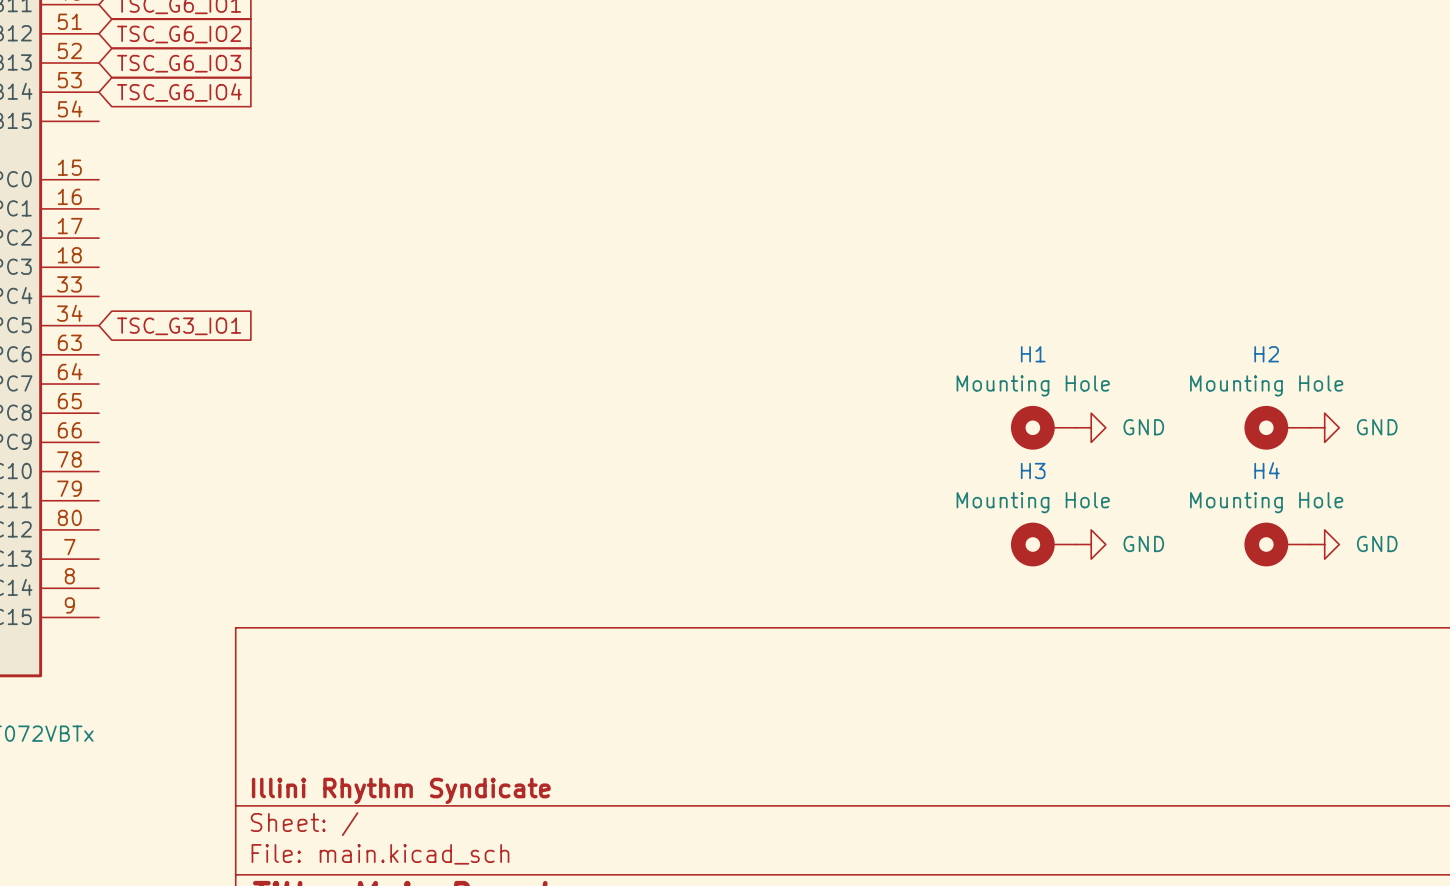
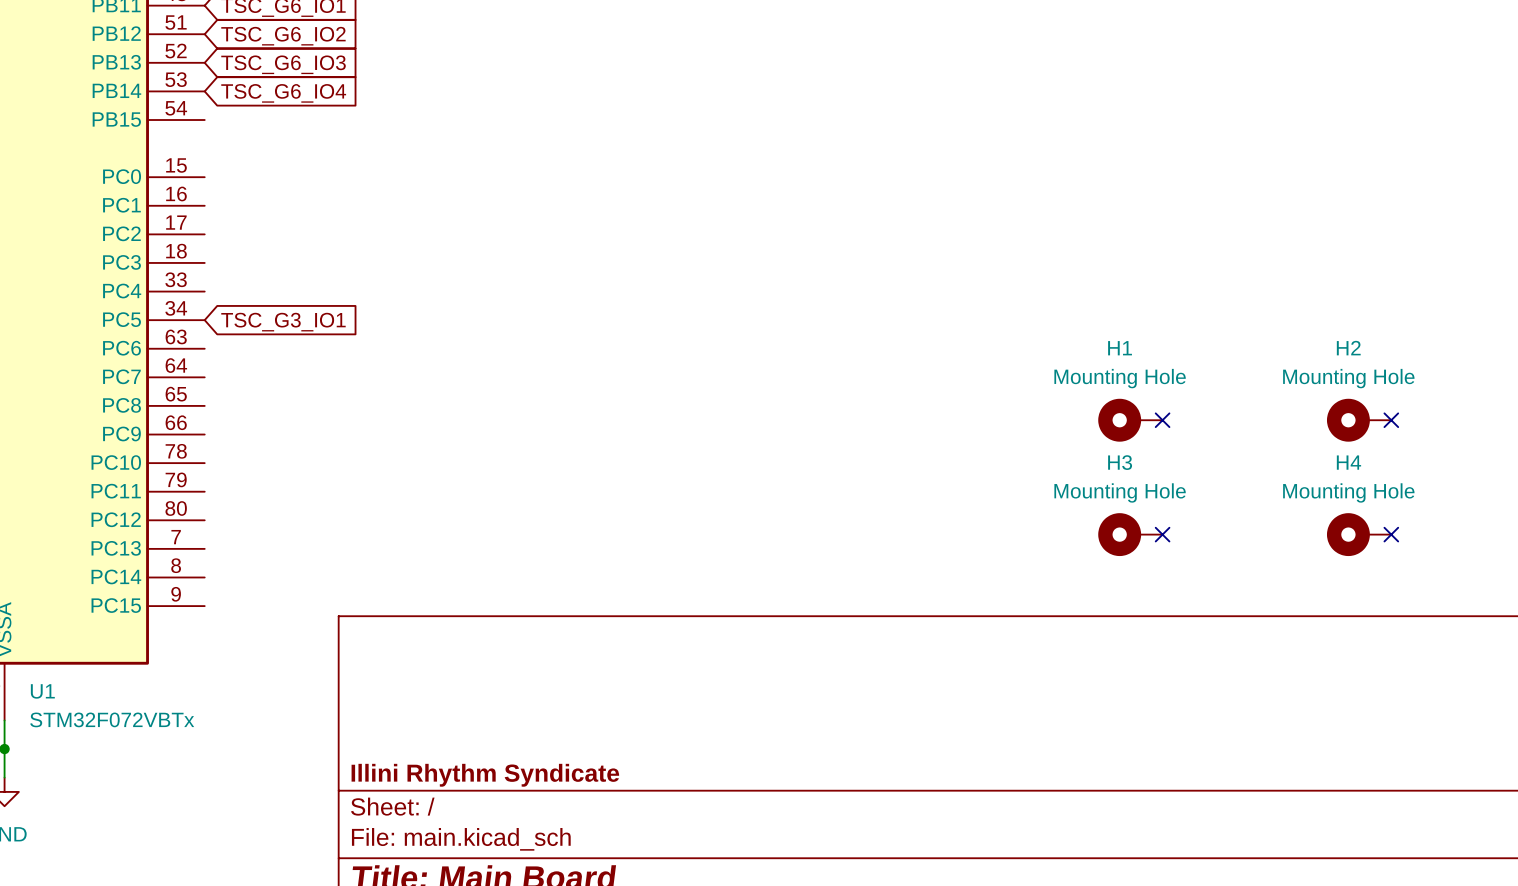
no-connect mark: none -> (1162, 420)
power symbol: GND (1091, 427) -> none
no-connect mark: none -> (1391, 420)
power symbol: GND (1324, 427) -> none
no-connect mark: none -> (1162, 534)
power symbol: GND (1091, 544) -> none
no-connect mark: none -> (1391, 534)
power symbol: GND (1324, 544) -> none

